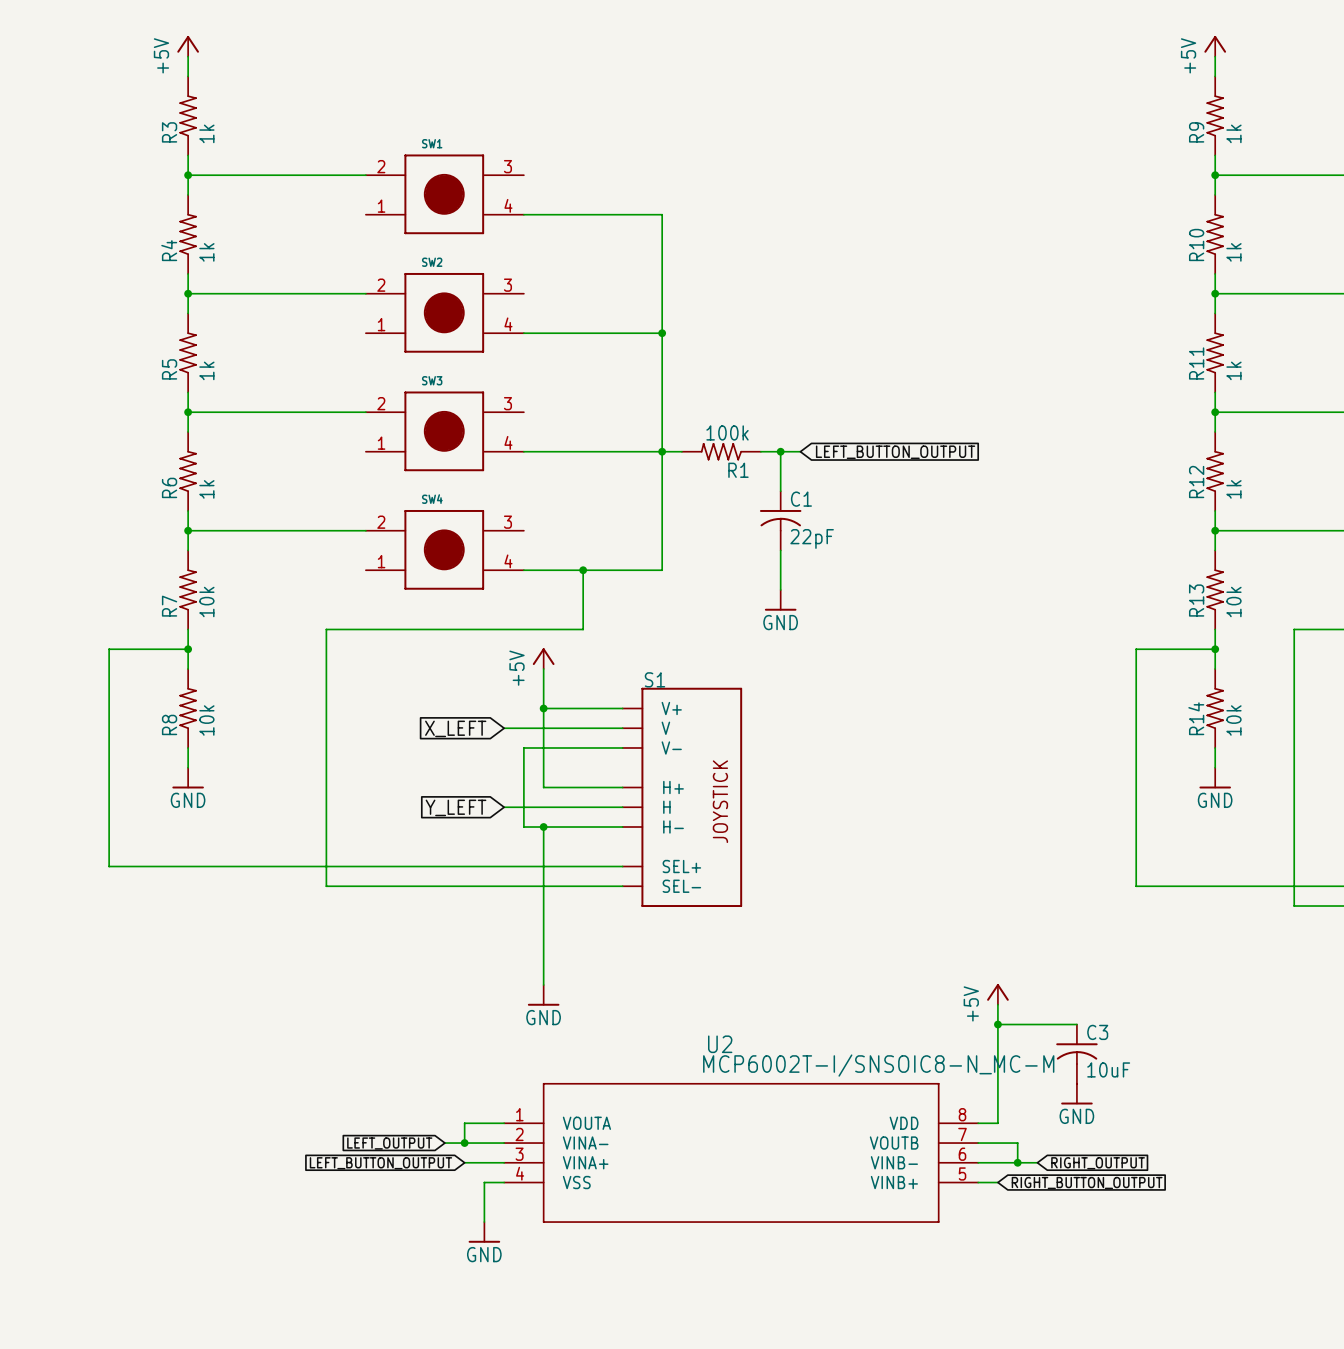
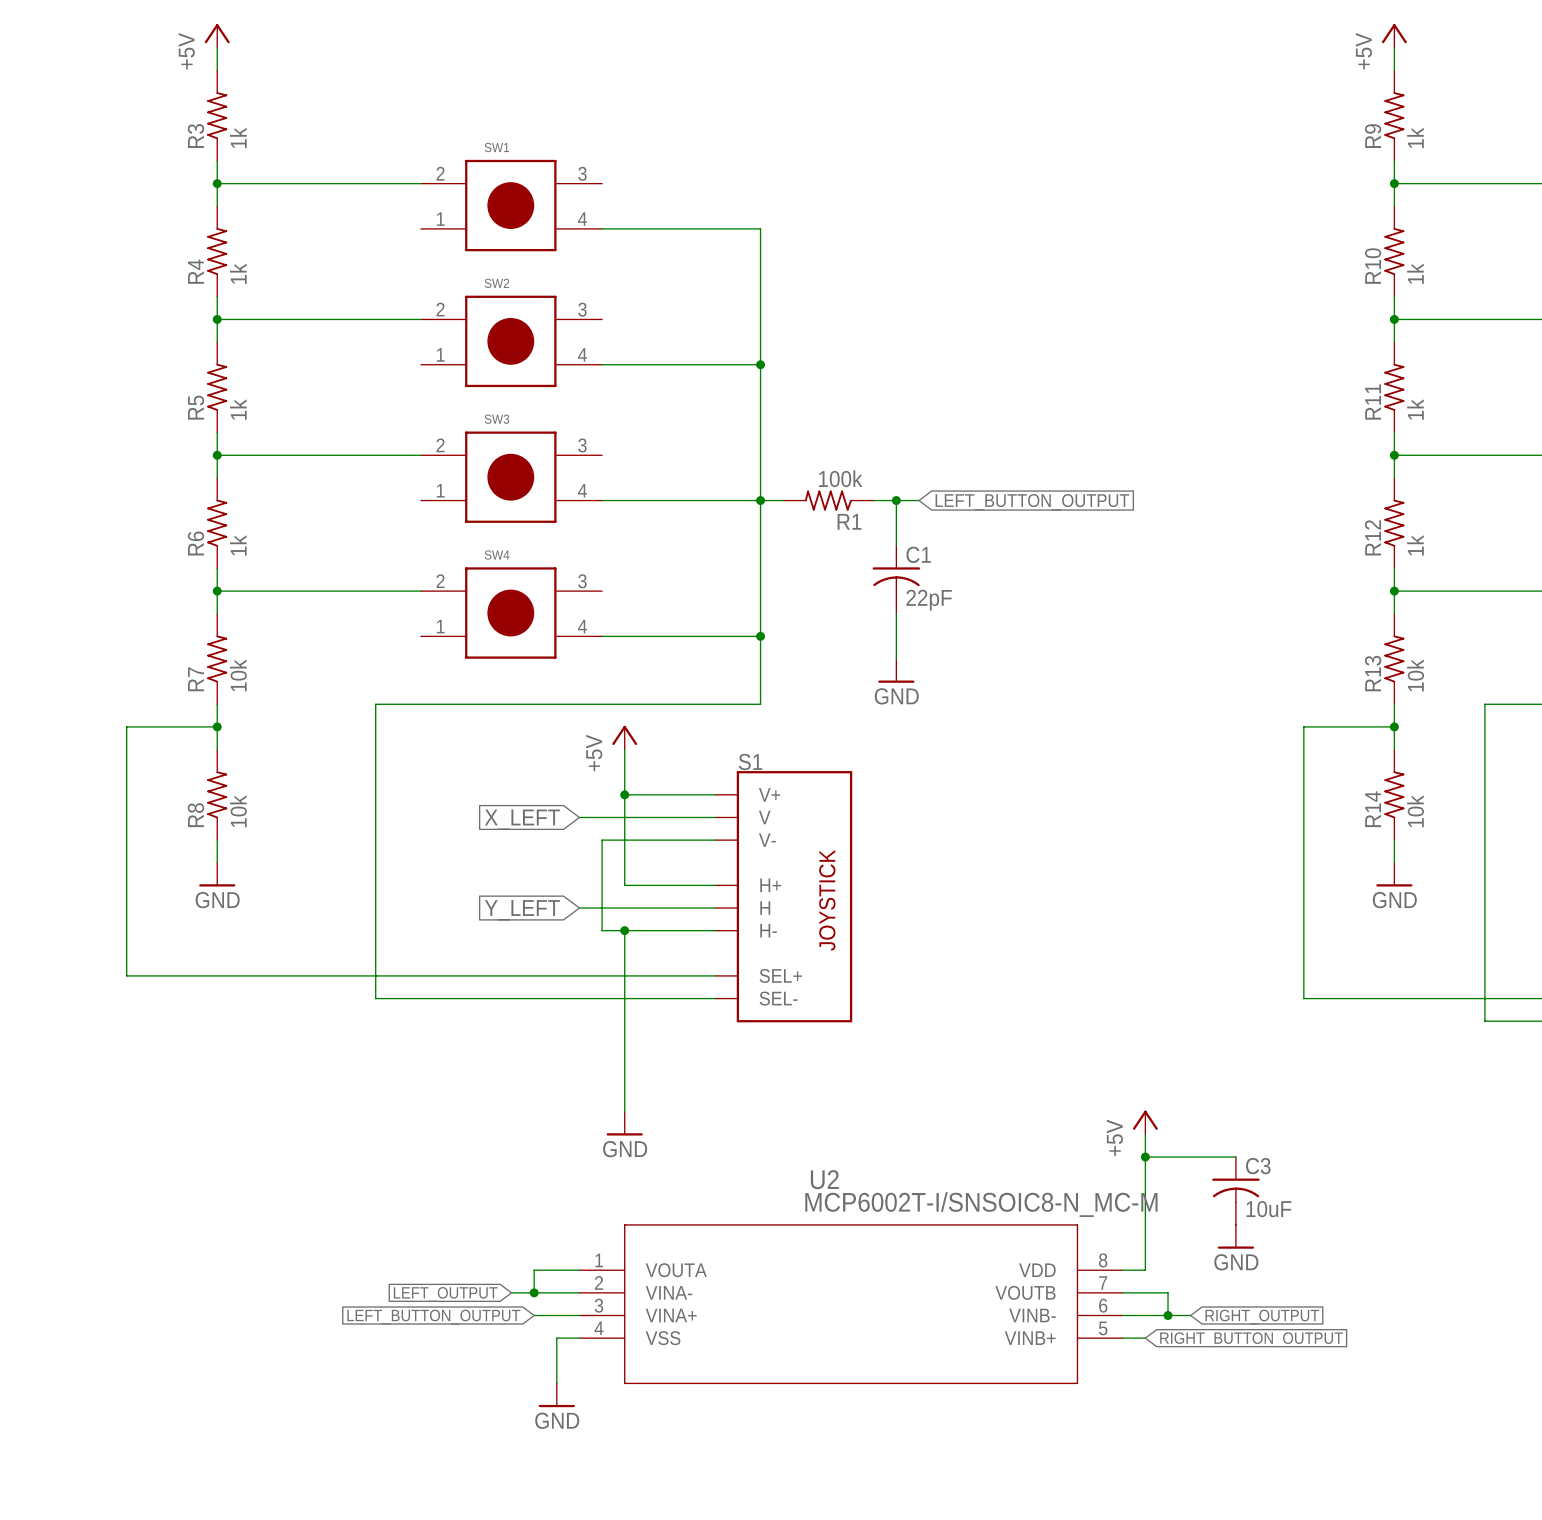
wire: (583, 570) (583, 629) -> (760, 636) (760, 704) (669, 704)
junction: (583, 570) -> none
junction: none -> (760, 636)

